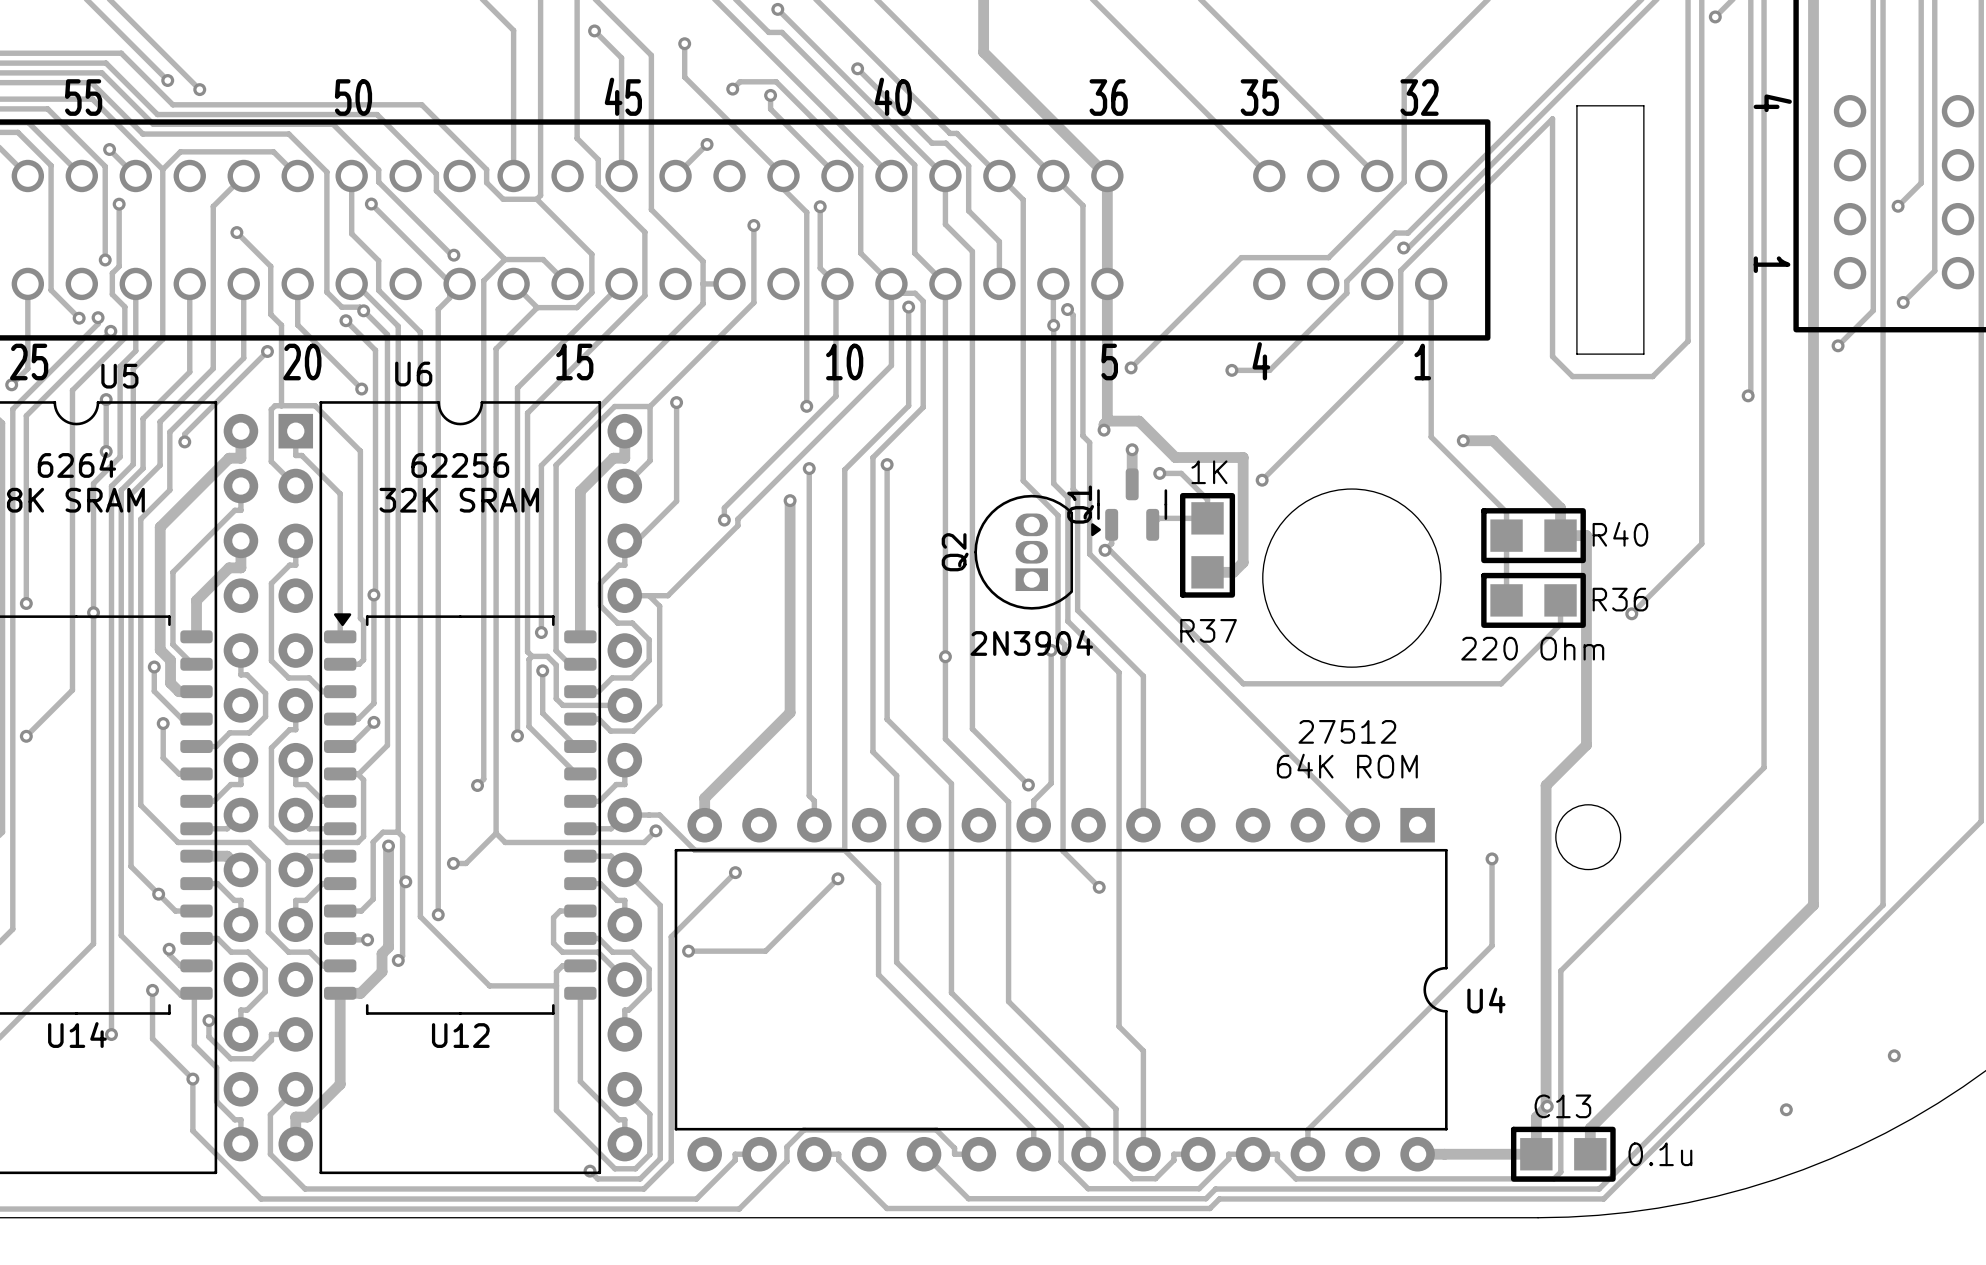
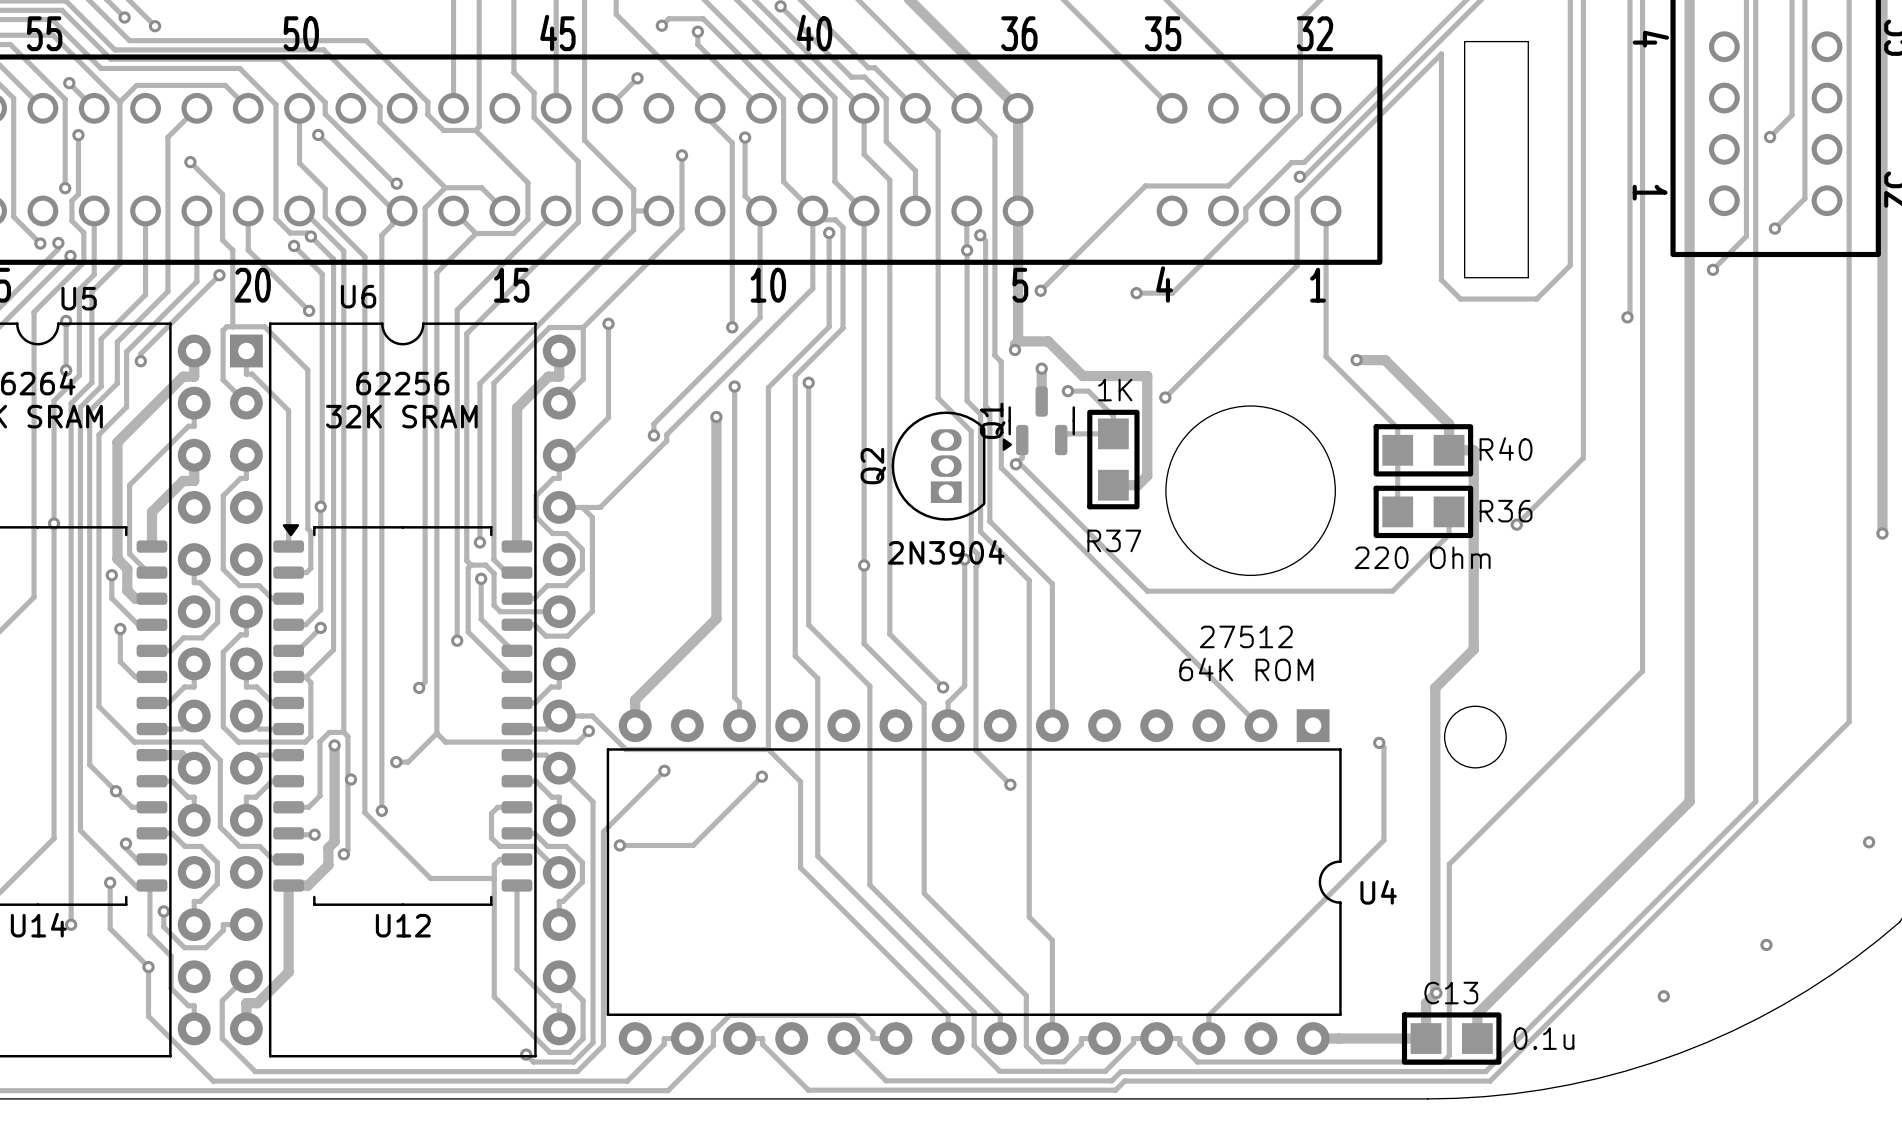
track: none -> (1379, 742) (1383, 747) (1383, 757)
via position: (1492, 858) -> (1379, 742)

